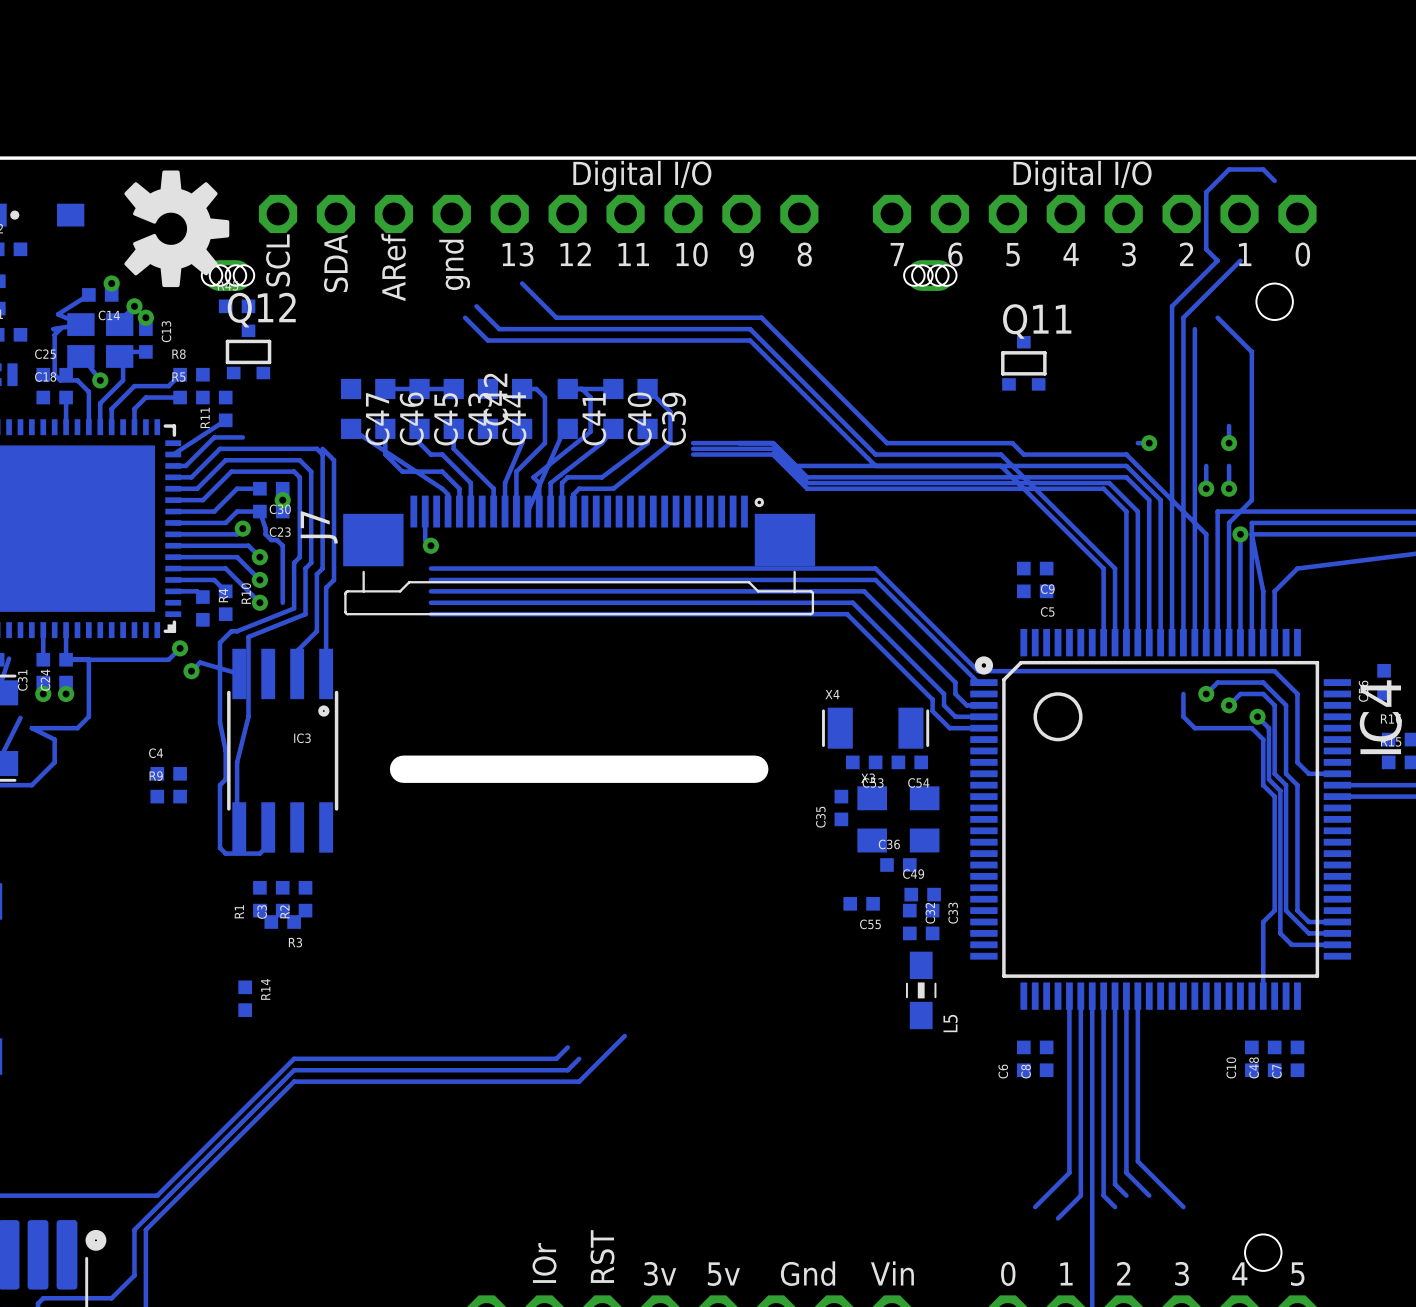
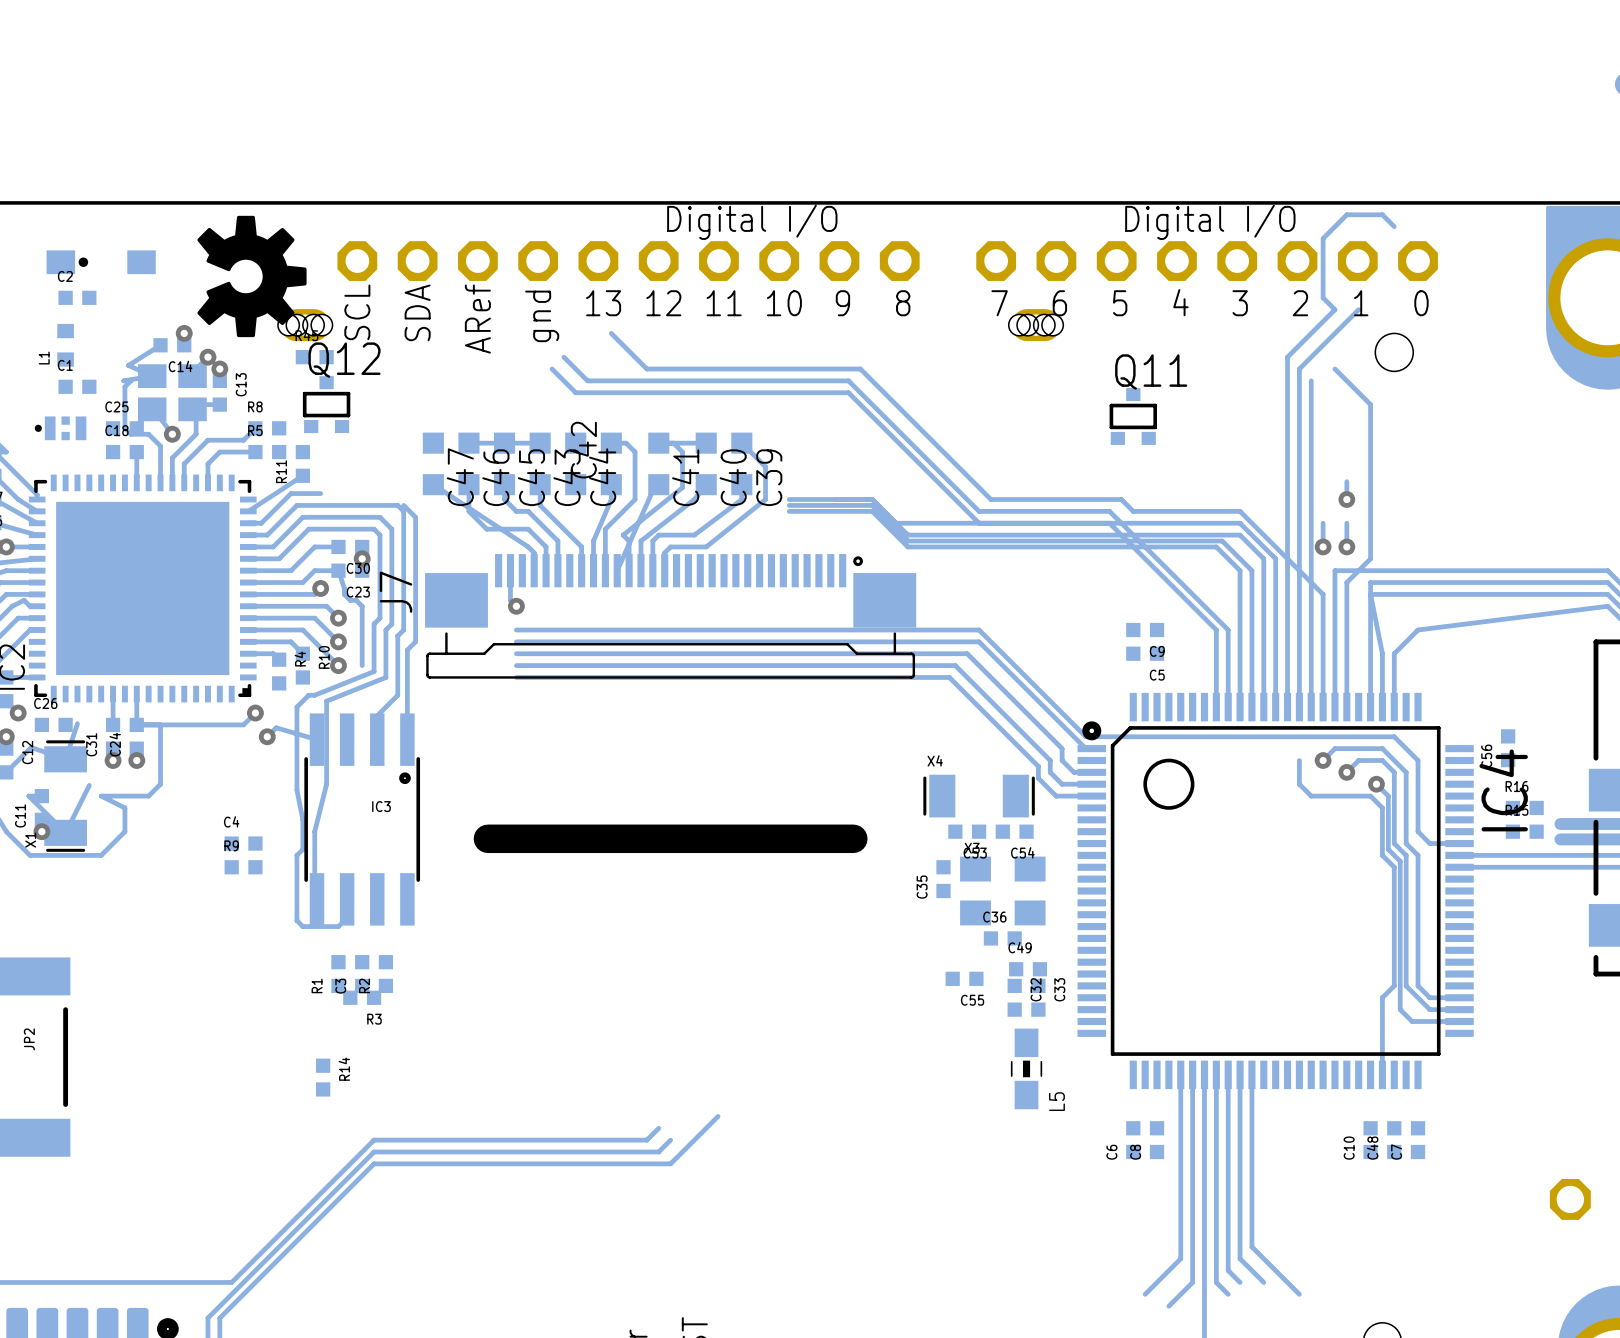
track: (1149, 443) (1137, 443) -> none
via: (1149, 443) -> none
track: (1240, 534) (1240, 642) -> none
via: (1240, 534) -> none

